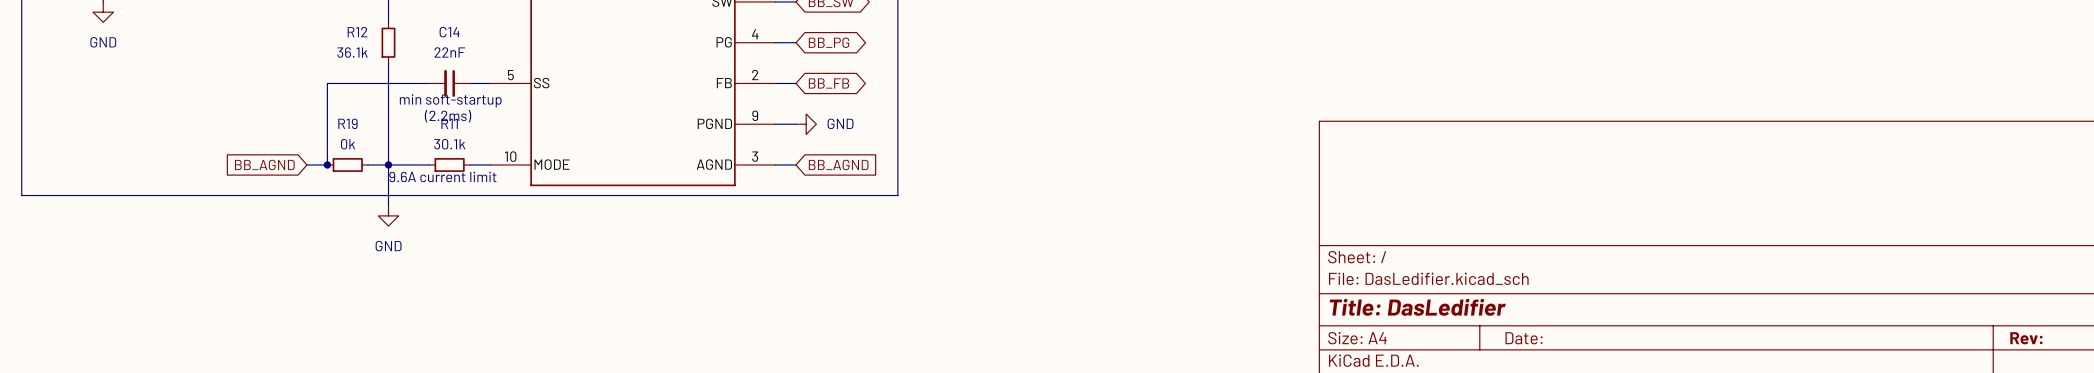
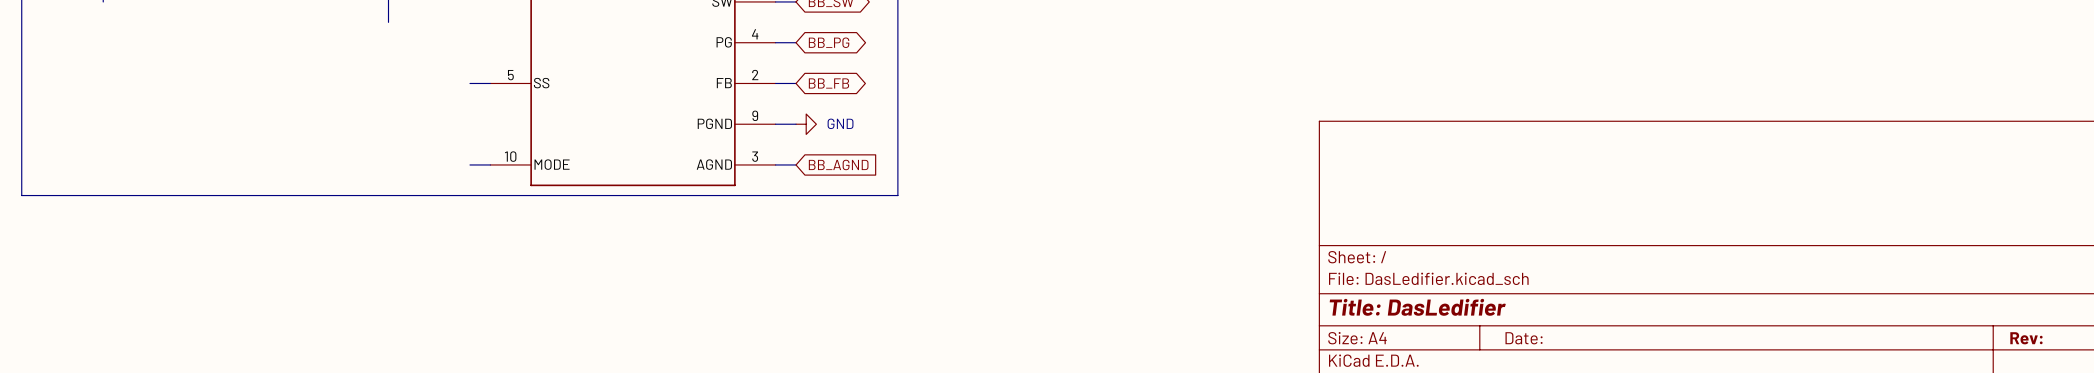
power symbol: GND (103, 12) -> none
R12: 36.1k (388, 42) -> none
wire: (388, 63) (388, 205) -> none
wire: (429, 83) (327, 83) (327, 164) (306, 164) -> none
C14: 22nF (449, 83) -> none
text: min soft-startup (450, 100) -> none
text: (2.2ms) (448, 116) -> none
global label: BB_AGND (264, 164) -> none
junction: (327, 164) -> none
R19: 0k (347, 164) -> none
wire: (368, 164) (429, 164) -> none
junction: (388, 164) -> none
R11: 30.1k (449, 164) -> none
text: 9.6A current limit (442, 177) -> none
power symbol: GND (388, 215) -> none

